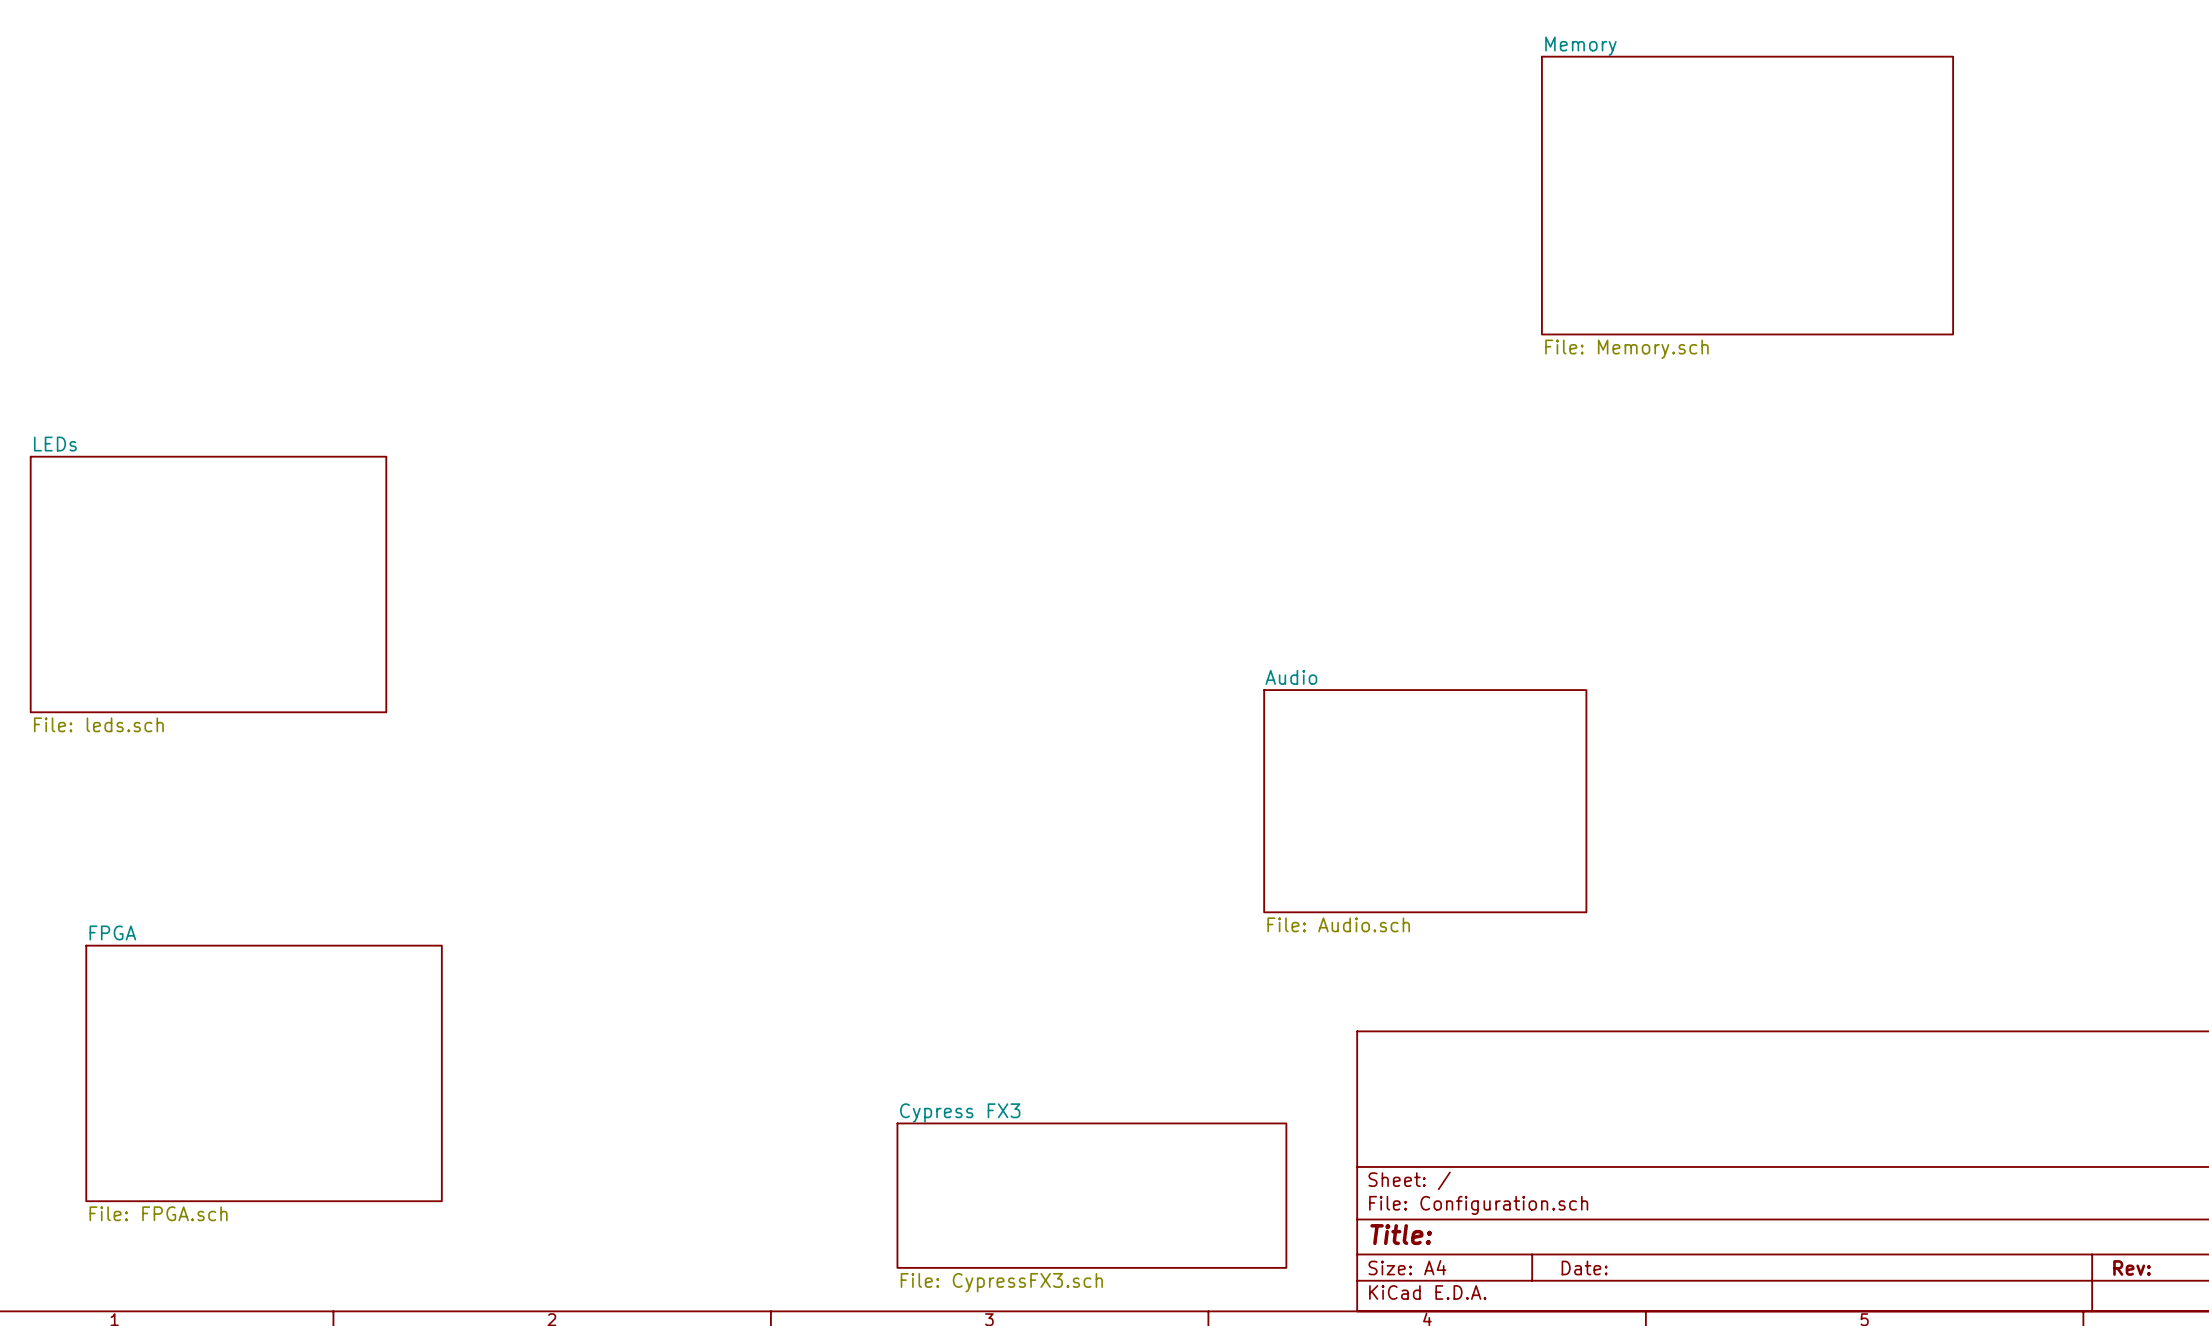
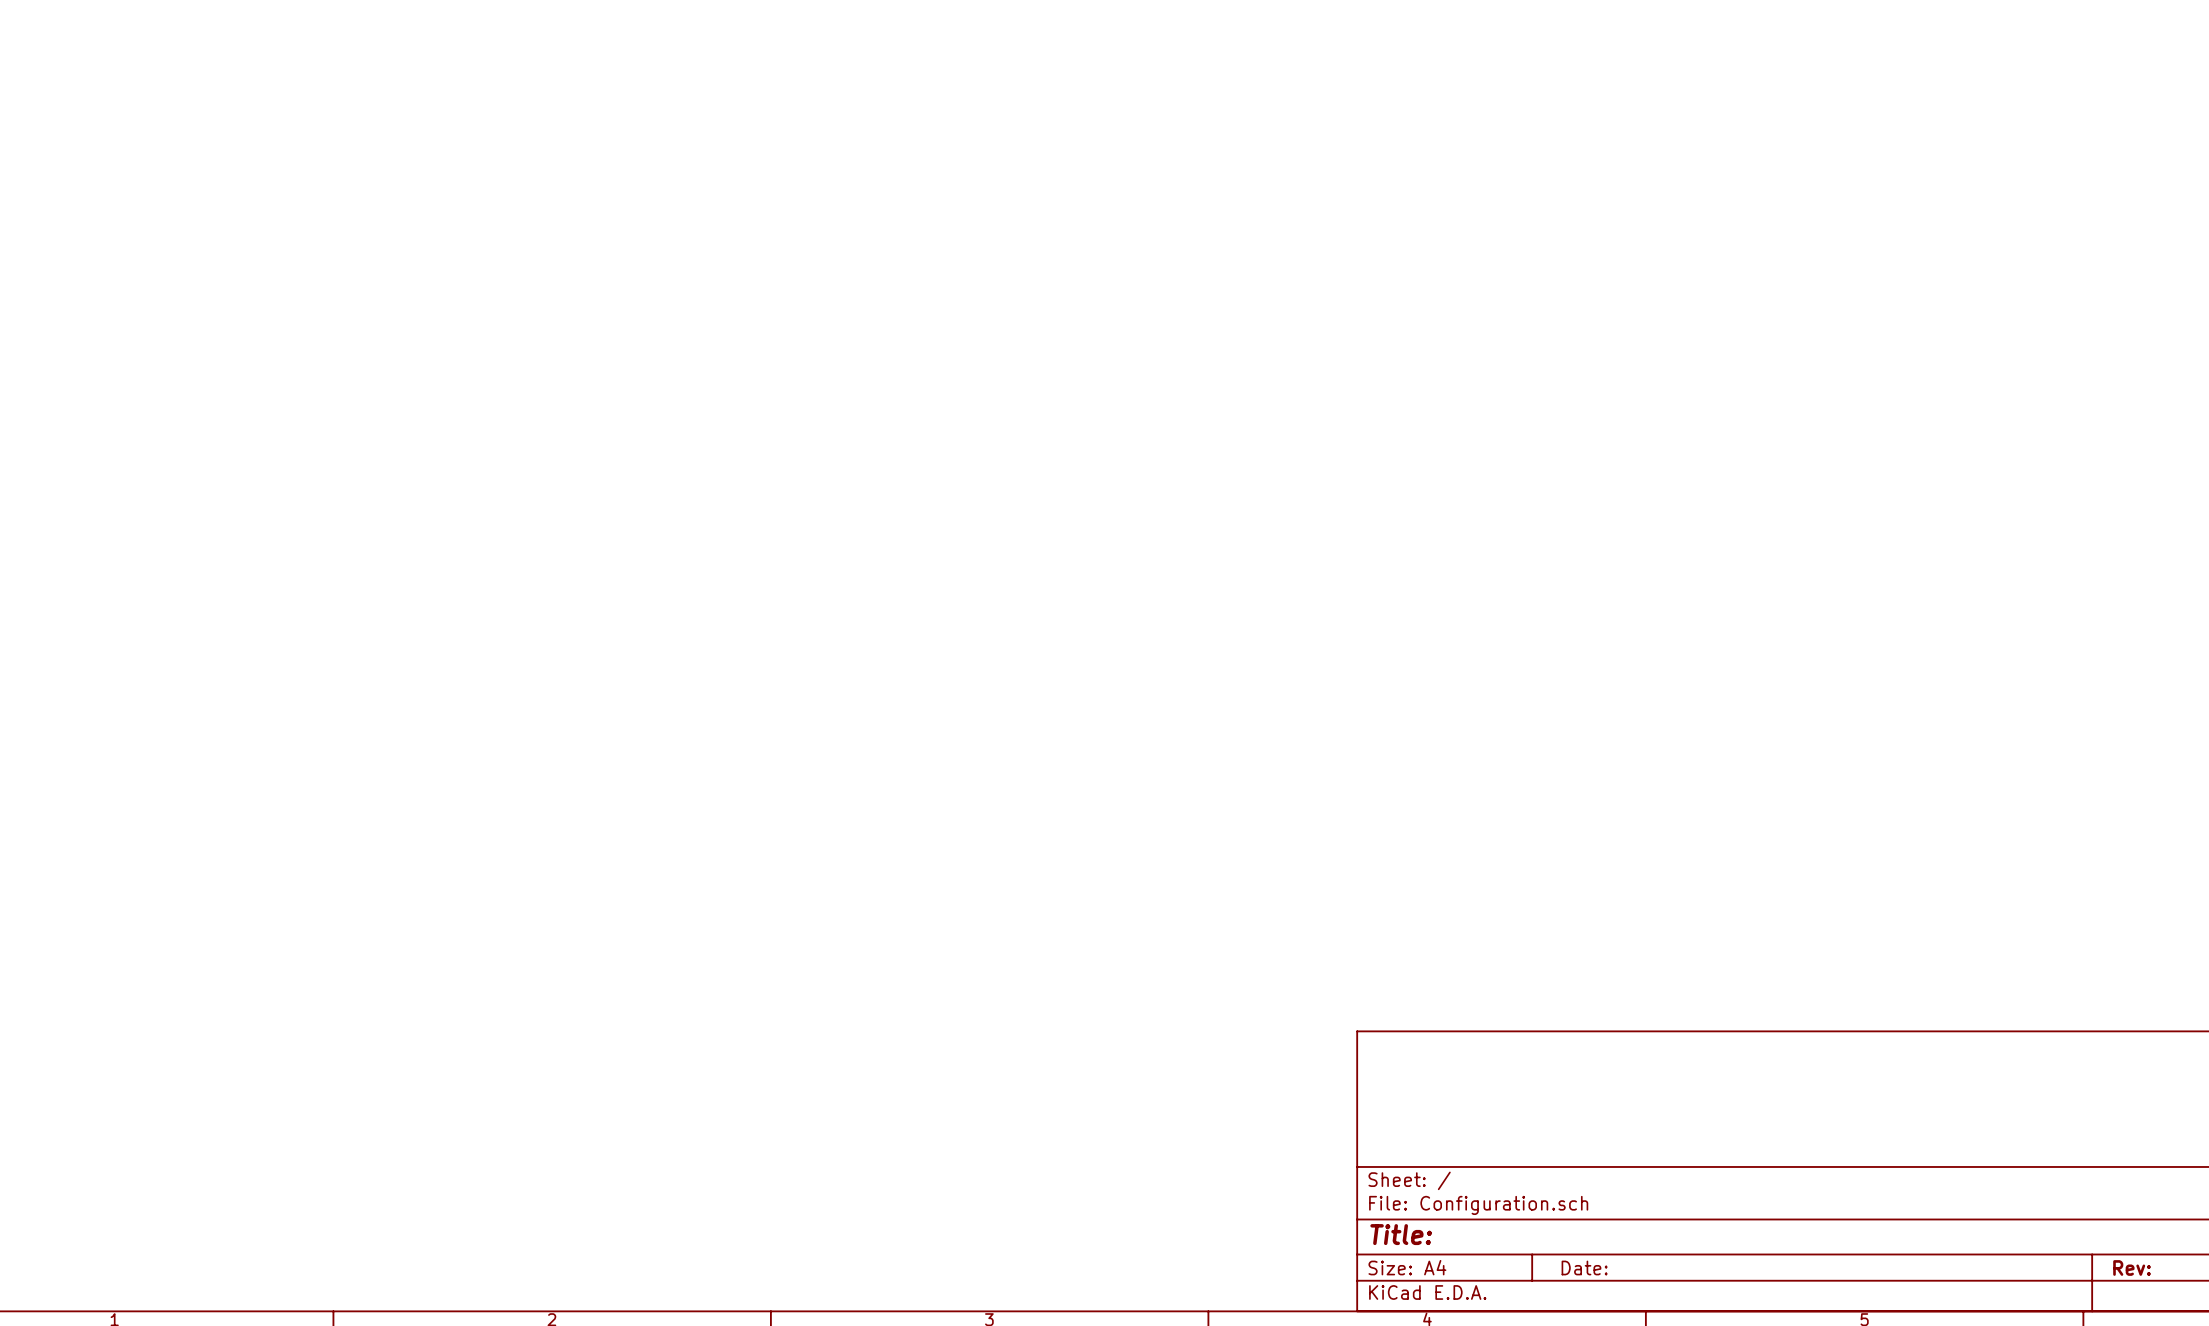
sheet Memory: File: Memory.sch (1747, 195) -> none
sheet LEDs: File: leds.sch (208, 584) -> none
sheet Audio: File: Audio.sch (1425, 801) -> none
sheet FPGA: File: FPGA.sch (264, 1073) -> none
sheet Cypress FX3: File: CypressFX3.sch (1091, 1195) -> none

